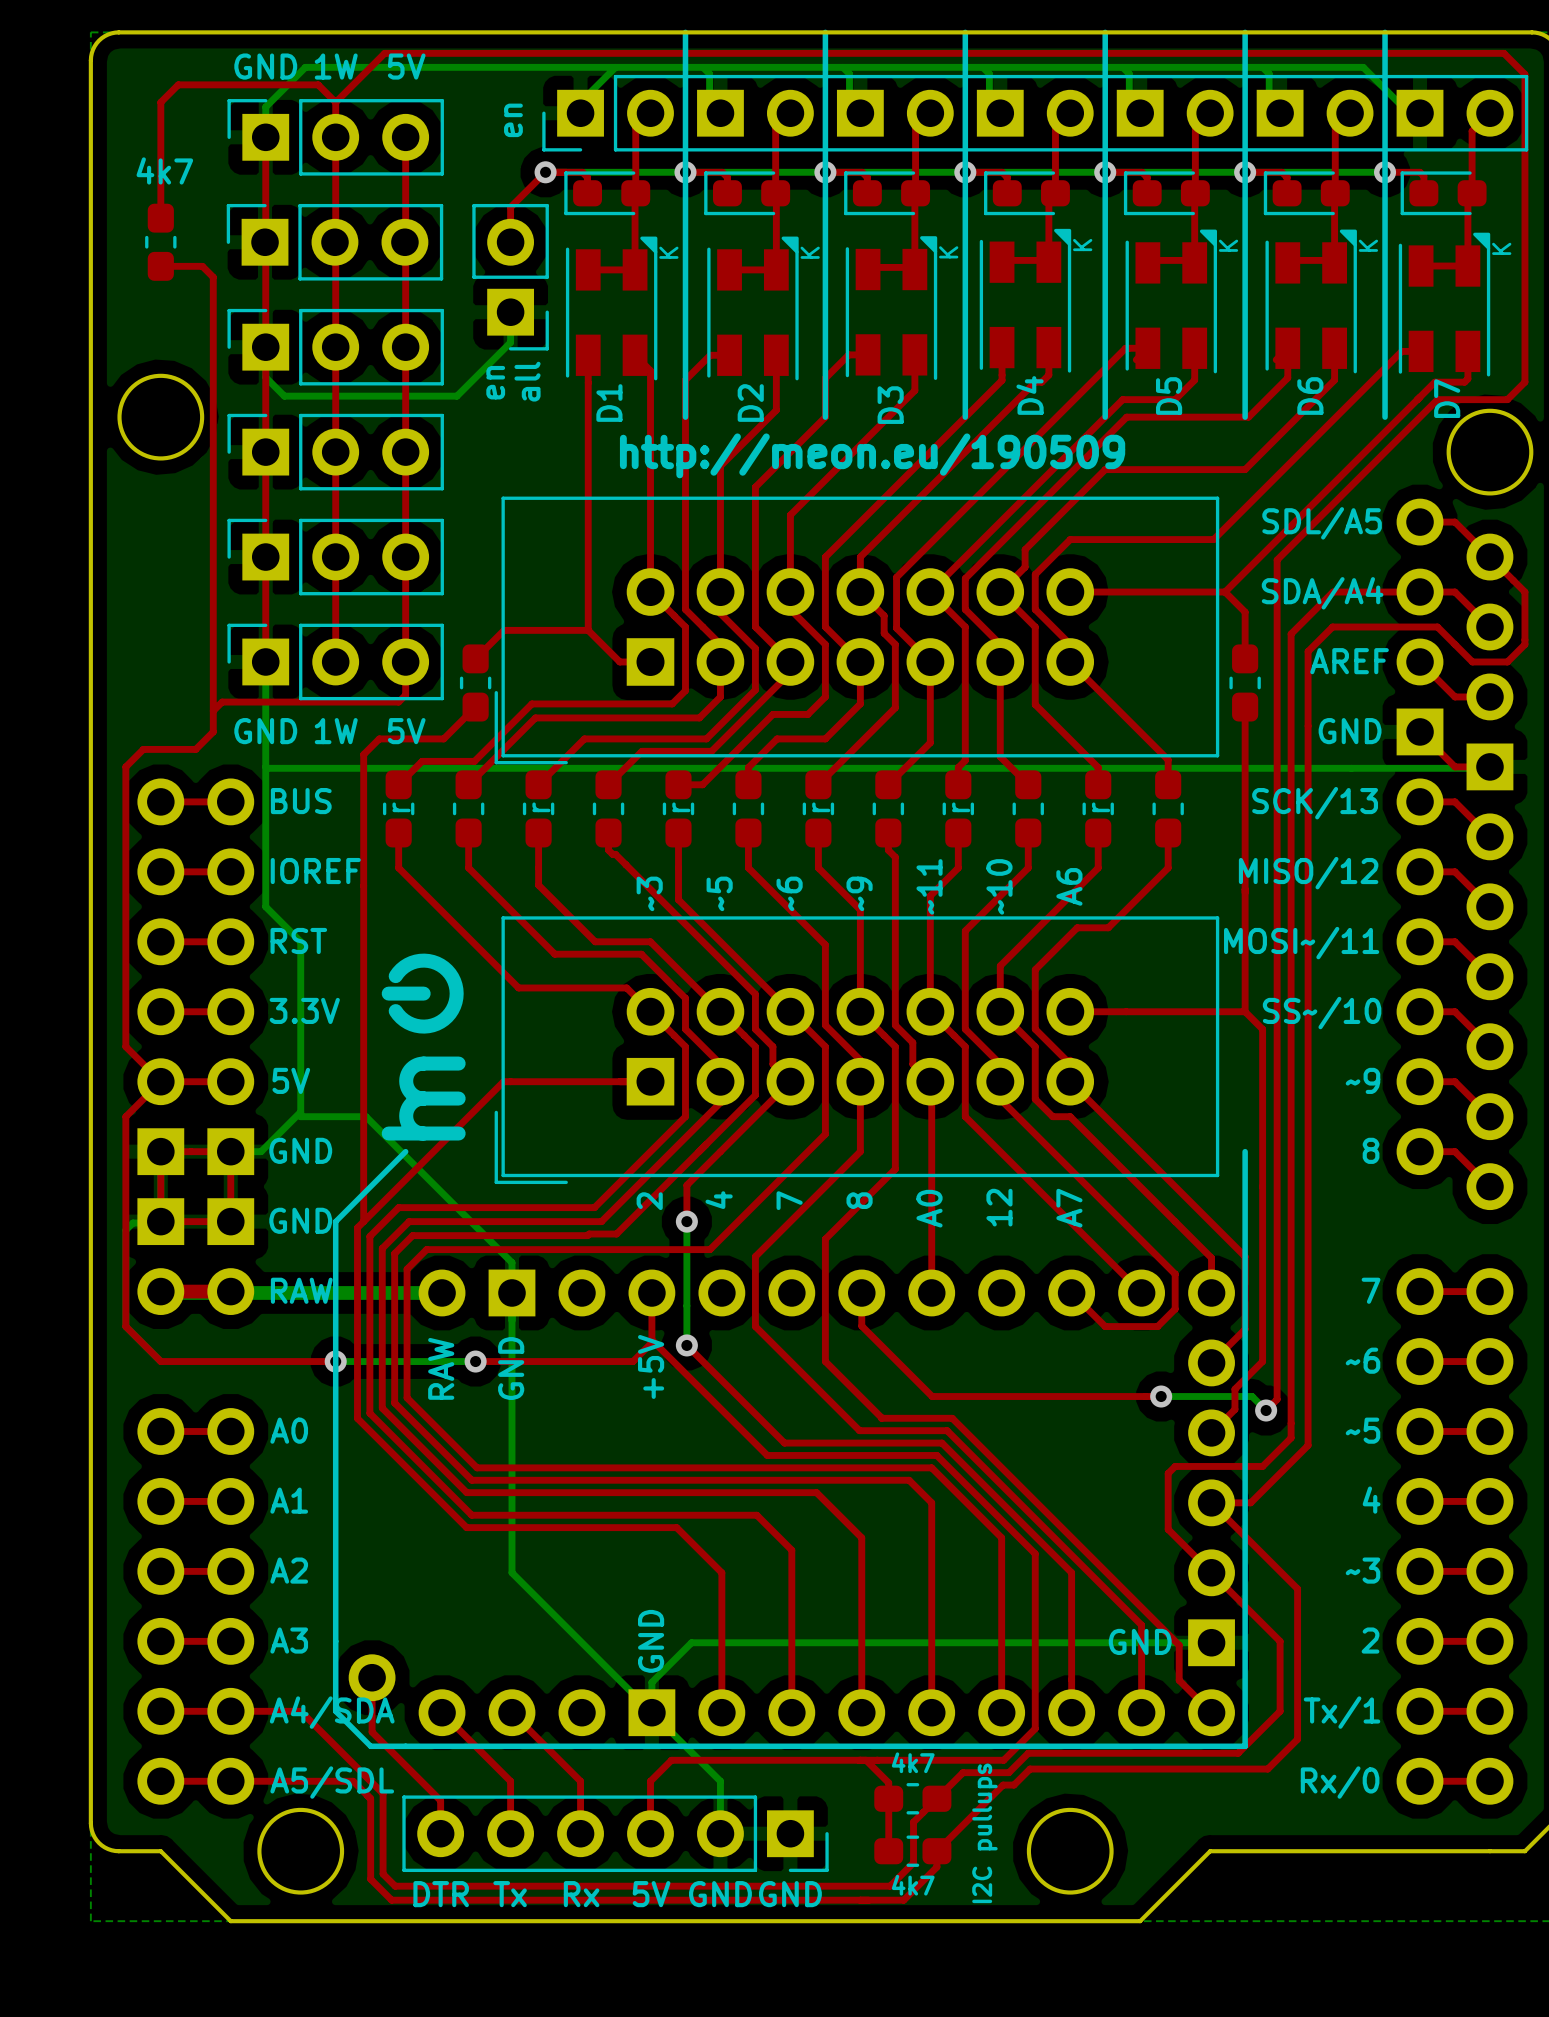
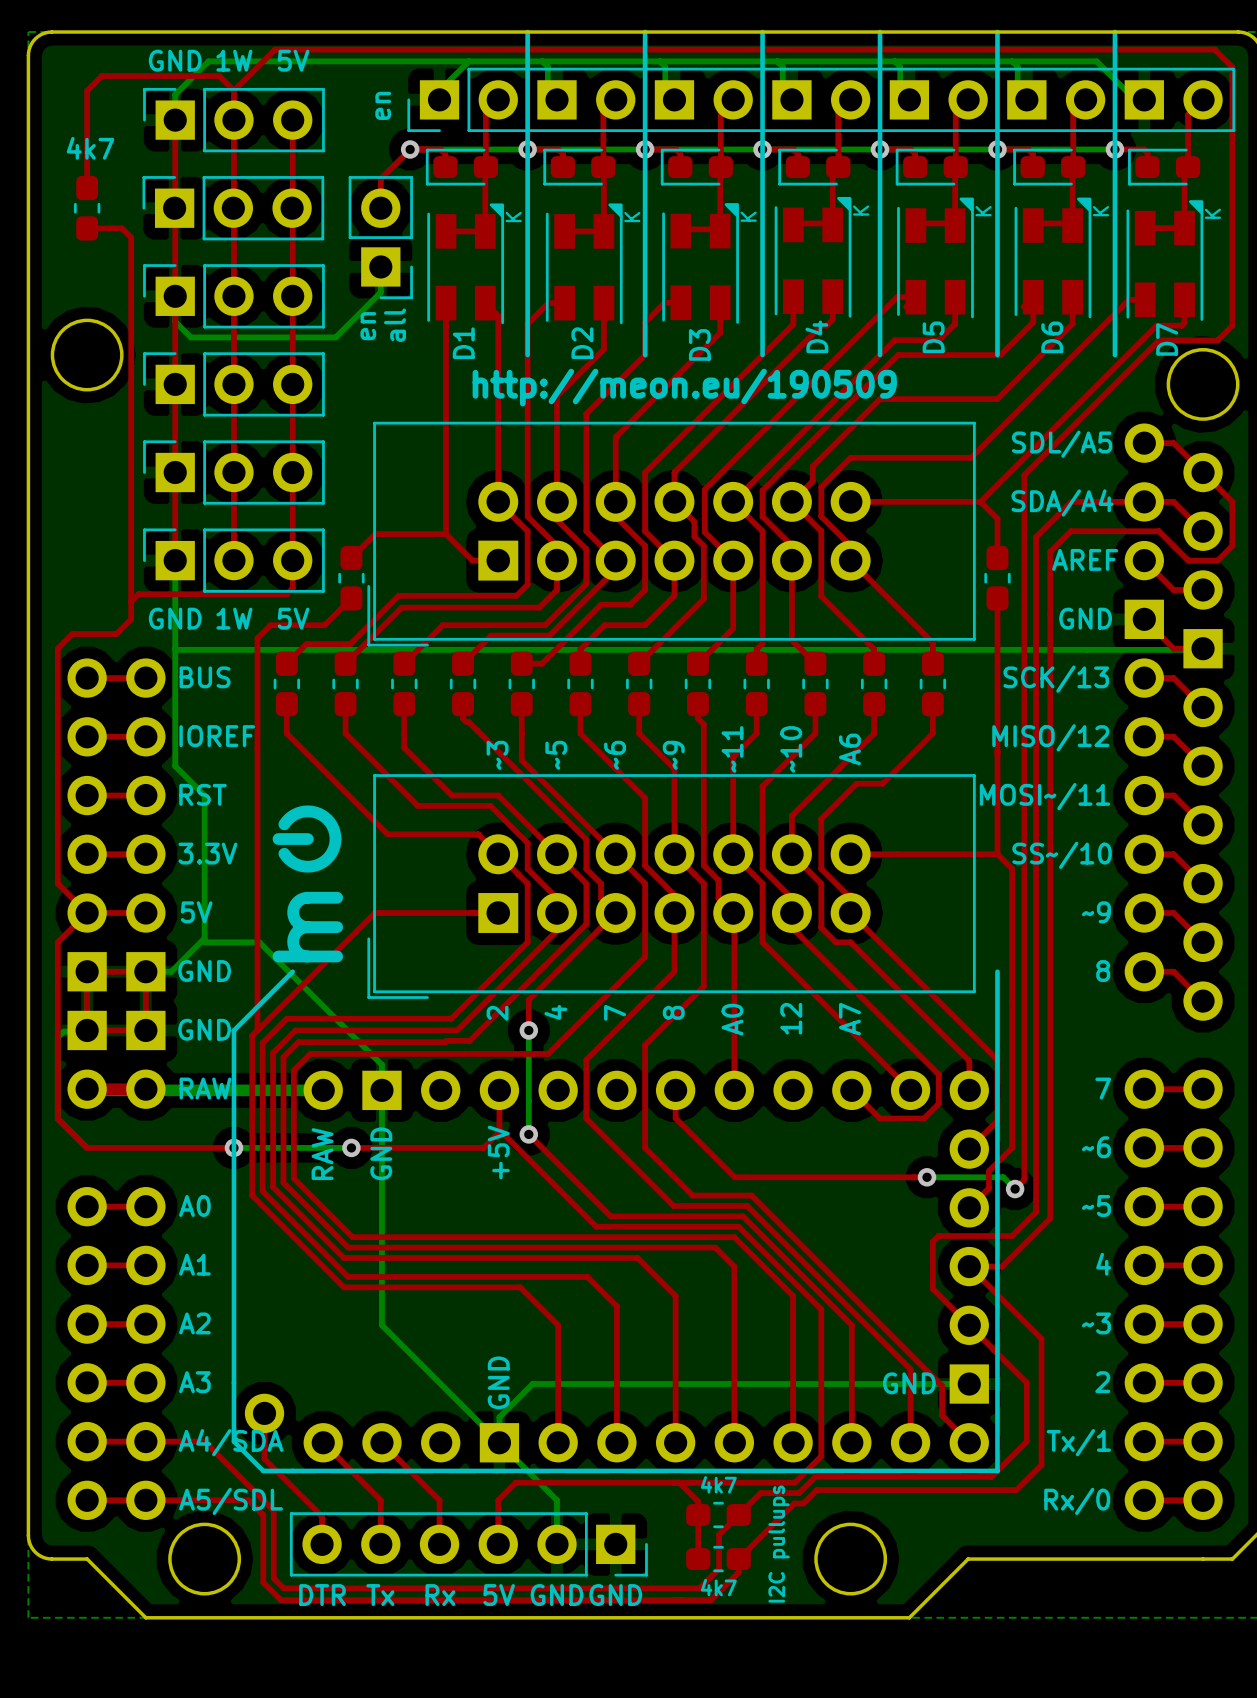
text: r (401, 807) -> none
text: r (541, 807) -> none
text: r (681, 807) -> none
text: r (821, 807) -> none
text: r (961, 807) -> none
text: r (1101, 807) -> none

